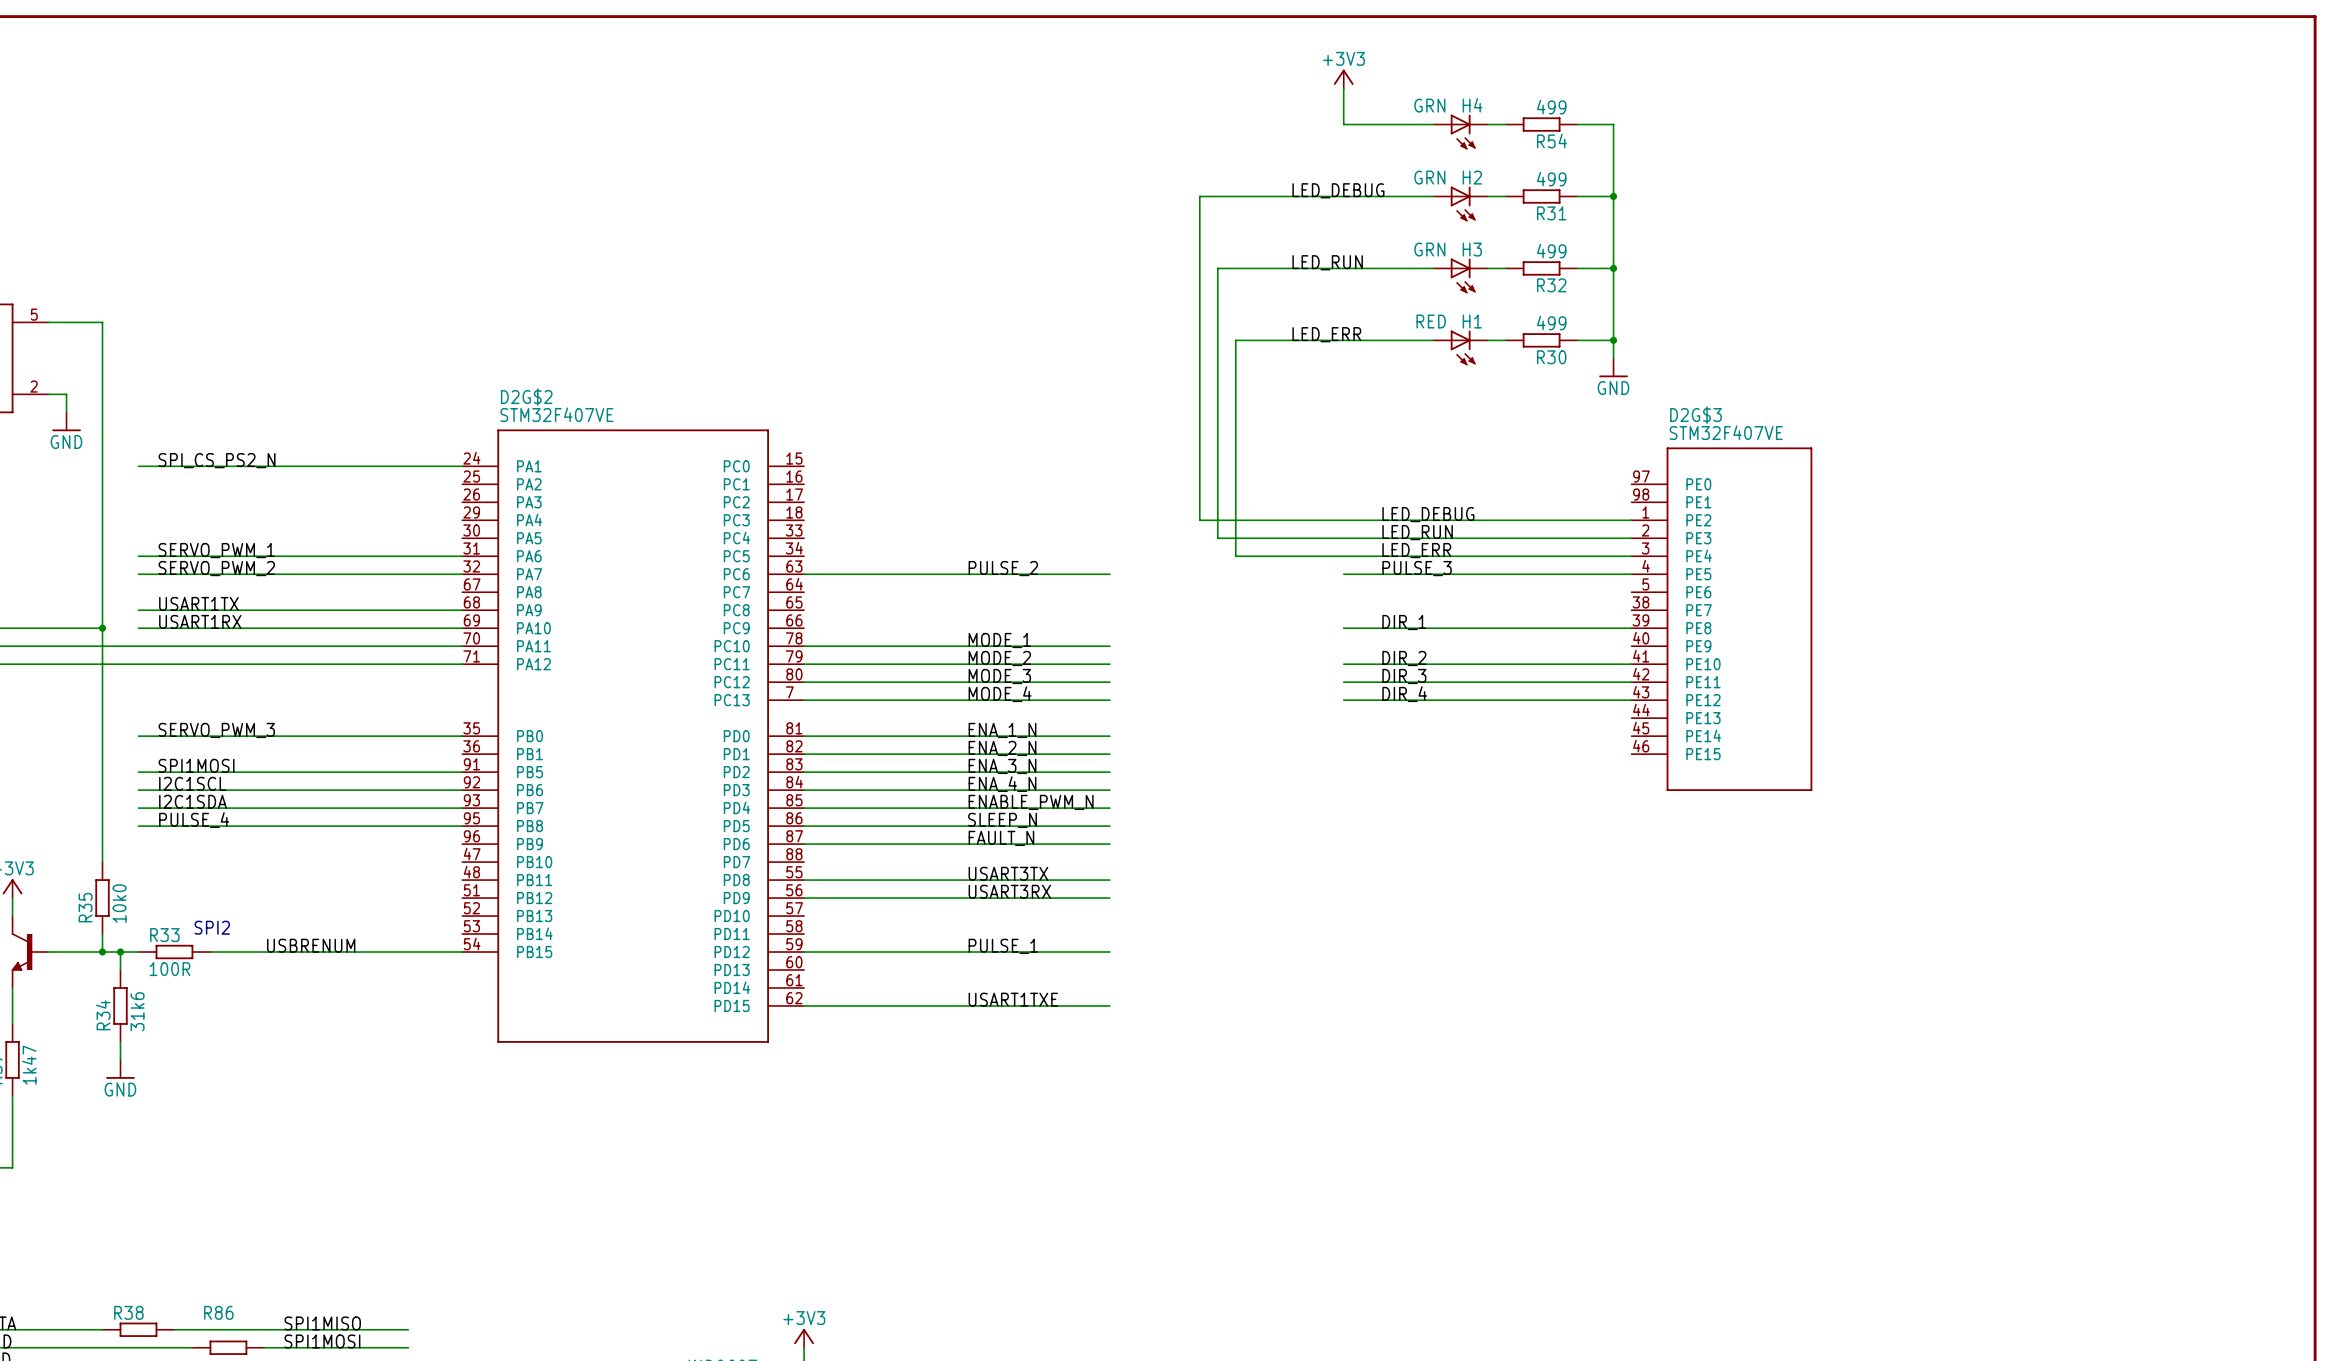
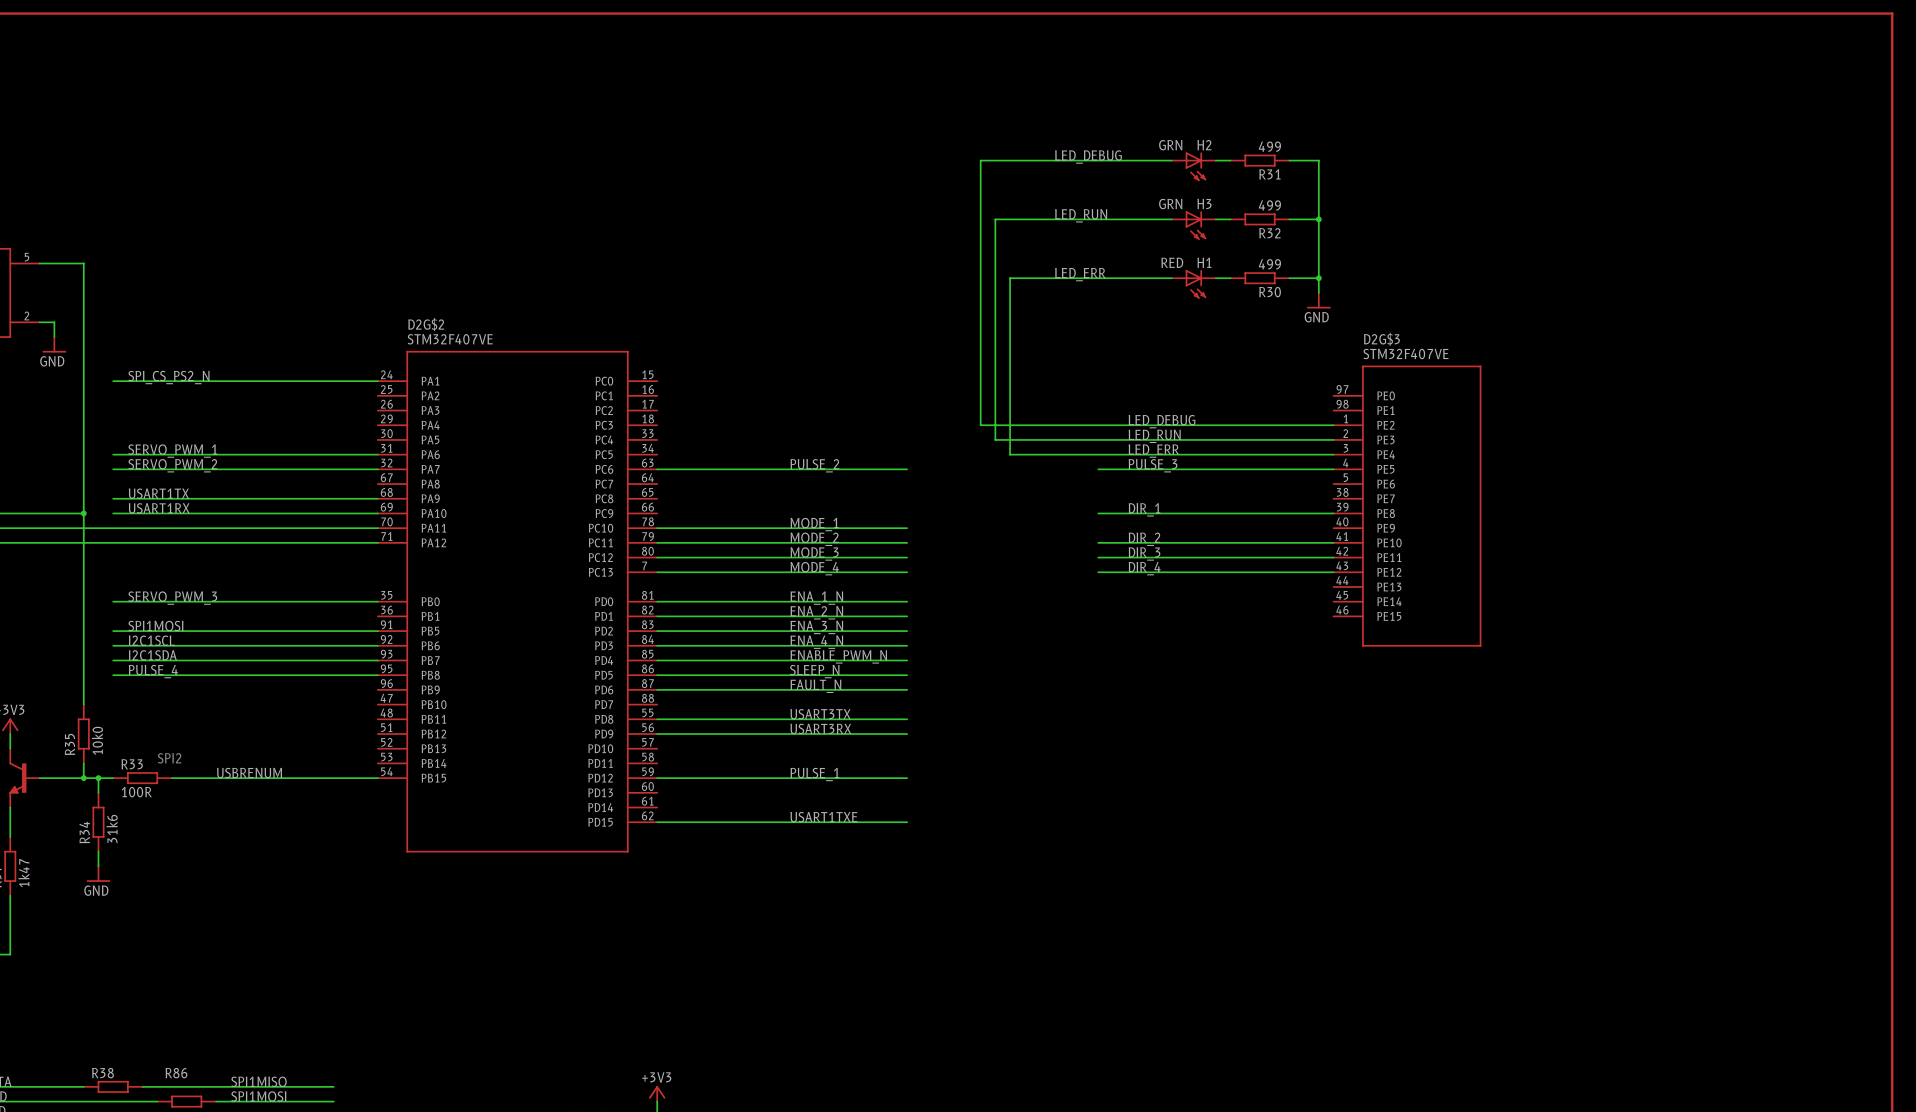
power symbol: +3V3 (1343, 79) -> none
wire: (1343, 88) (1343, 124) (1433, 124) -> none
wire: (1487, 124) (1505, 124) -> none
R54: 499 (1541, 124) -> none
wire: (1577, 124) (1613, 124) (1613, 196) -> none
H4: GRN (1460, 131) -> none
junction: (1613, 196) -> none

